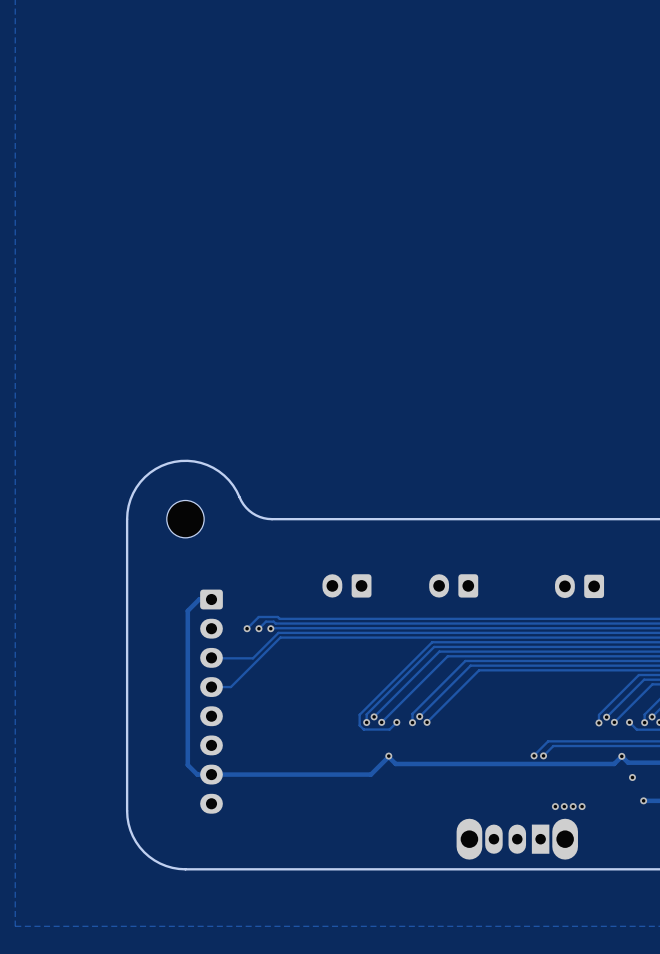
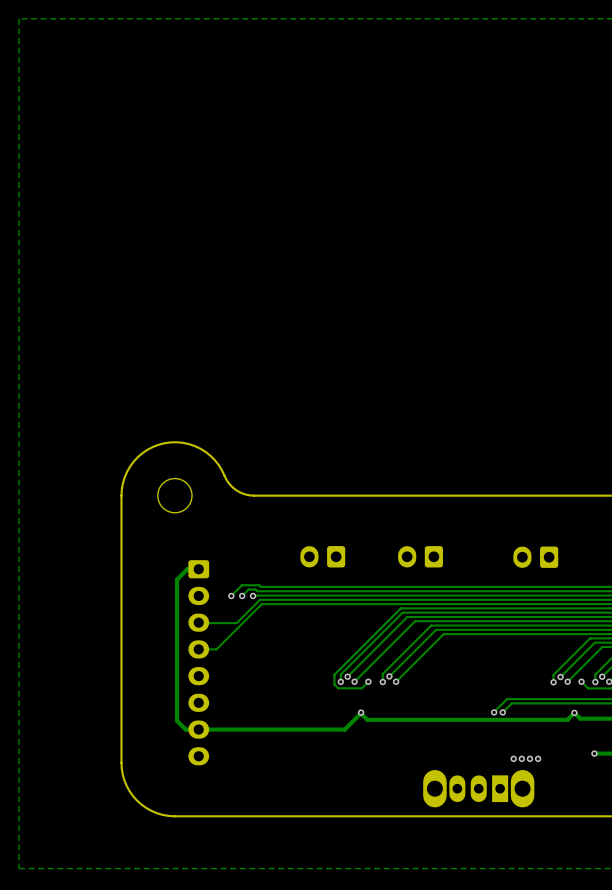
via: (632, 777) -> none

